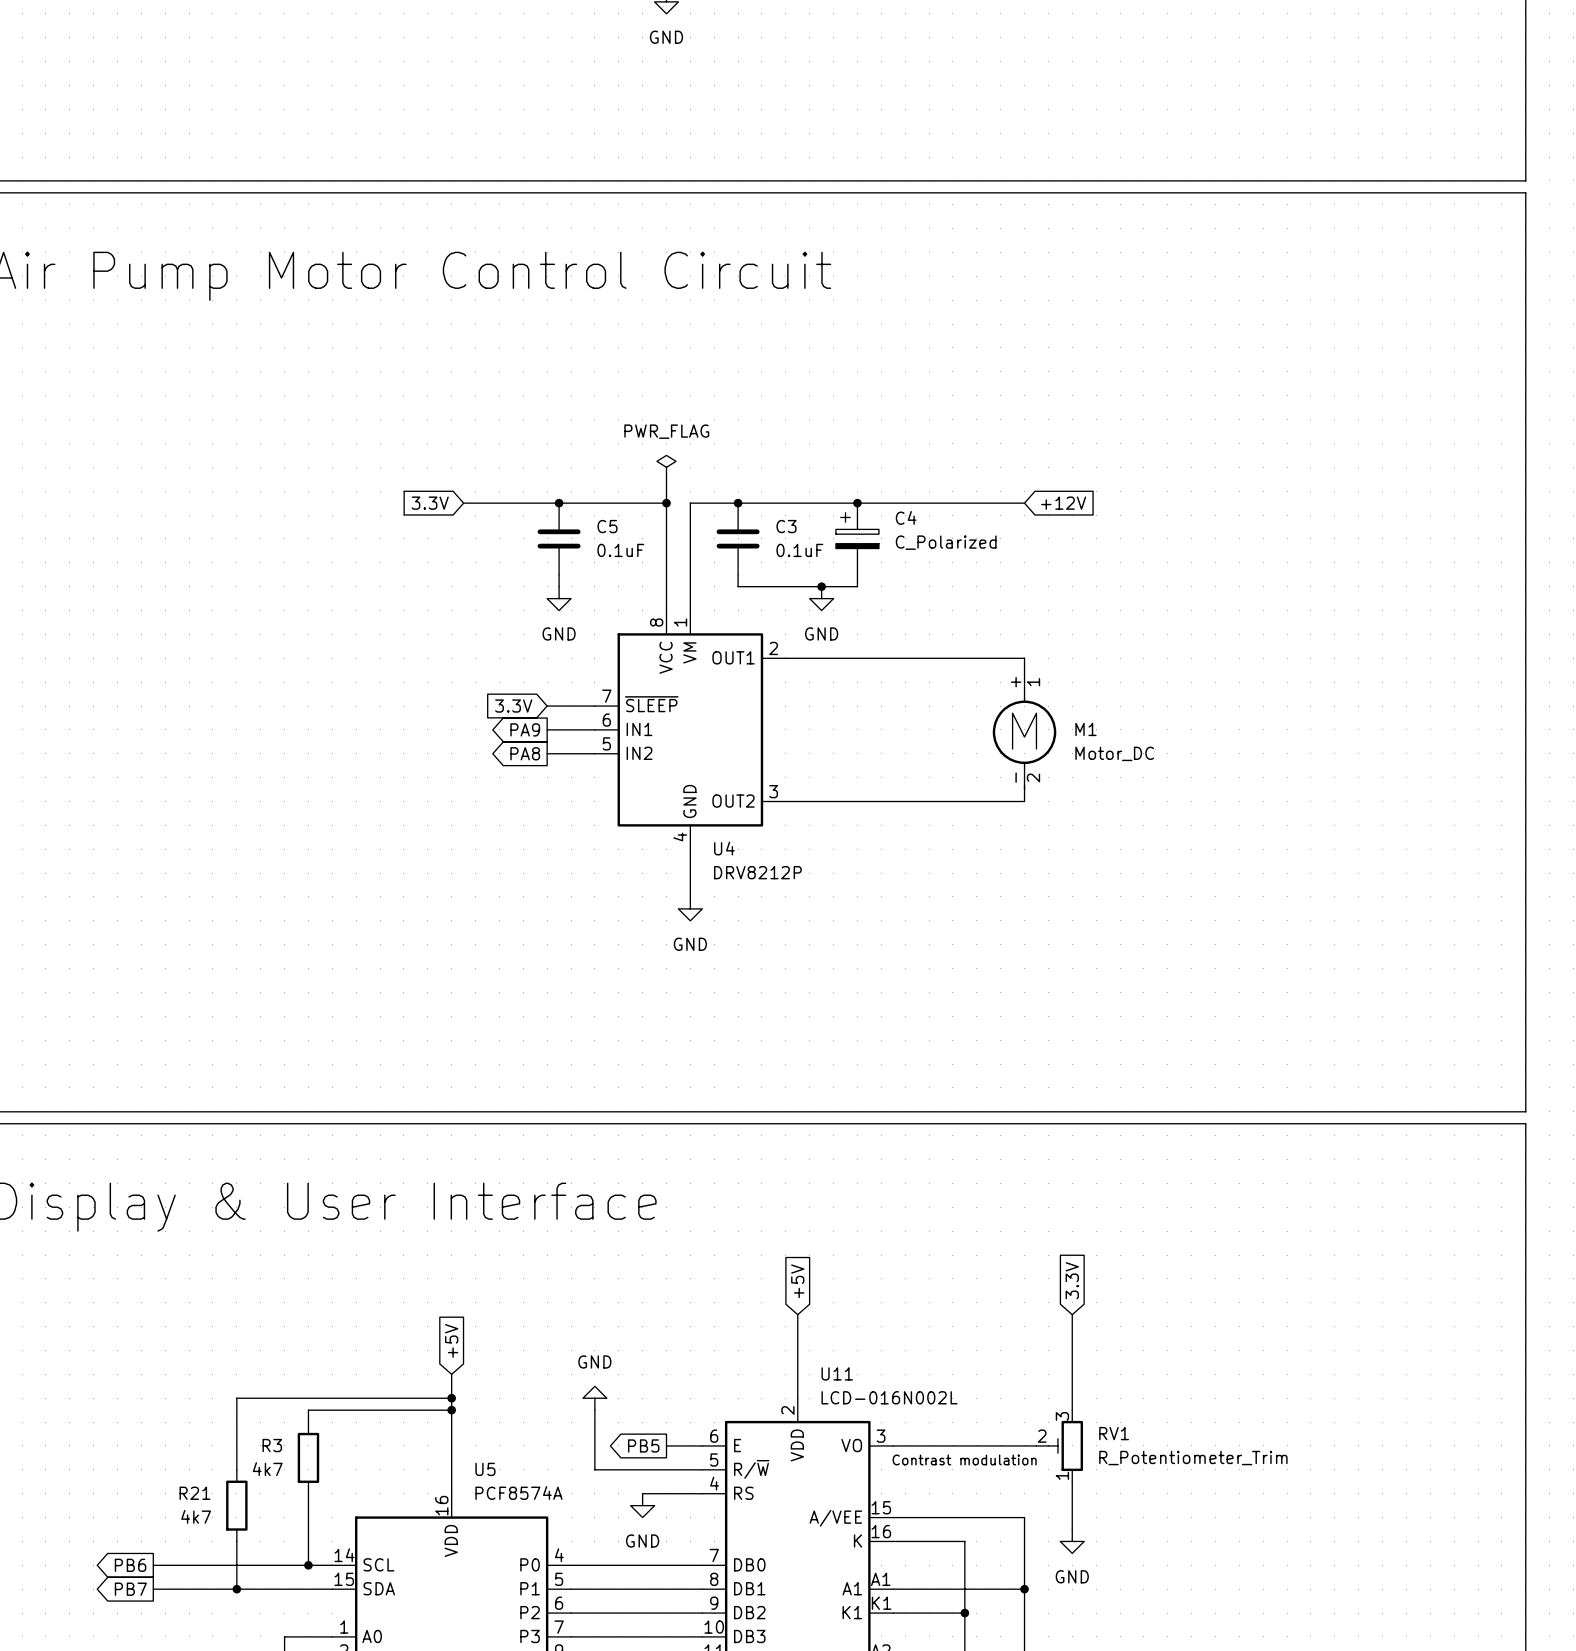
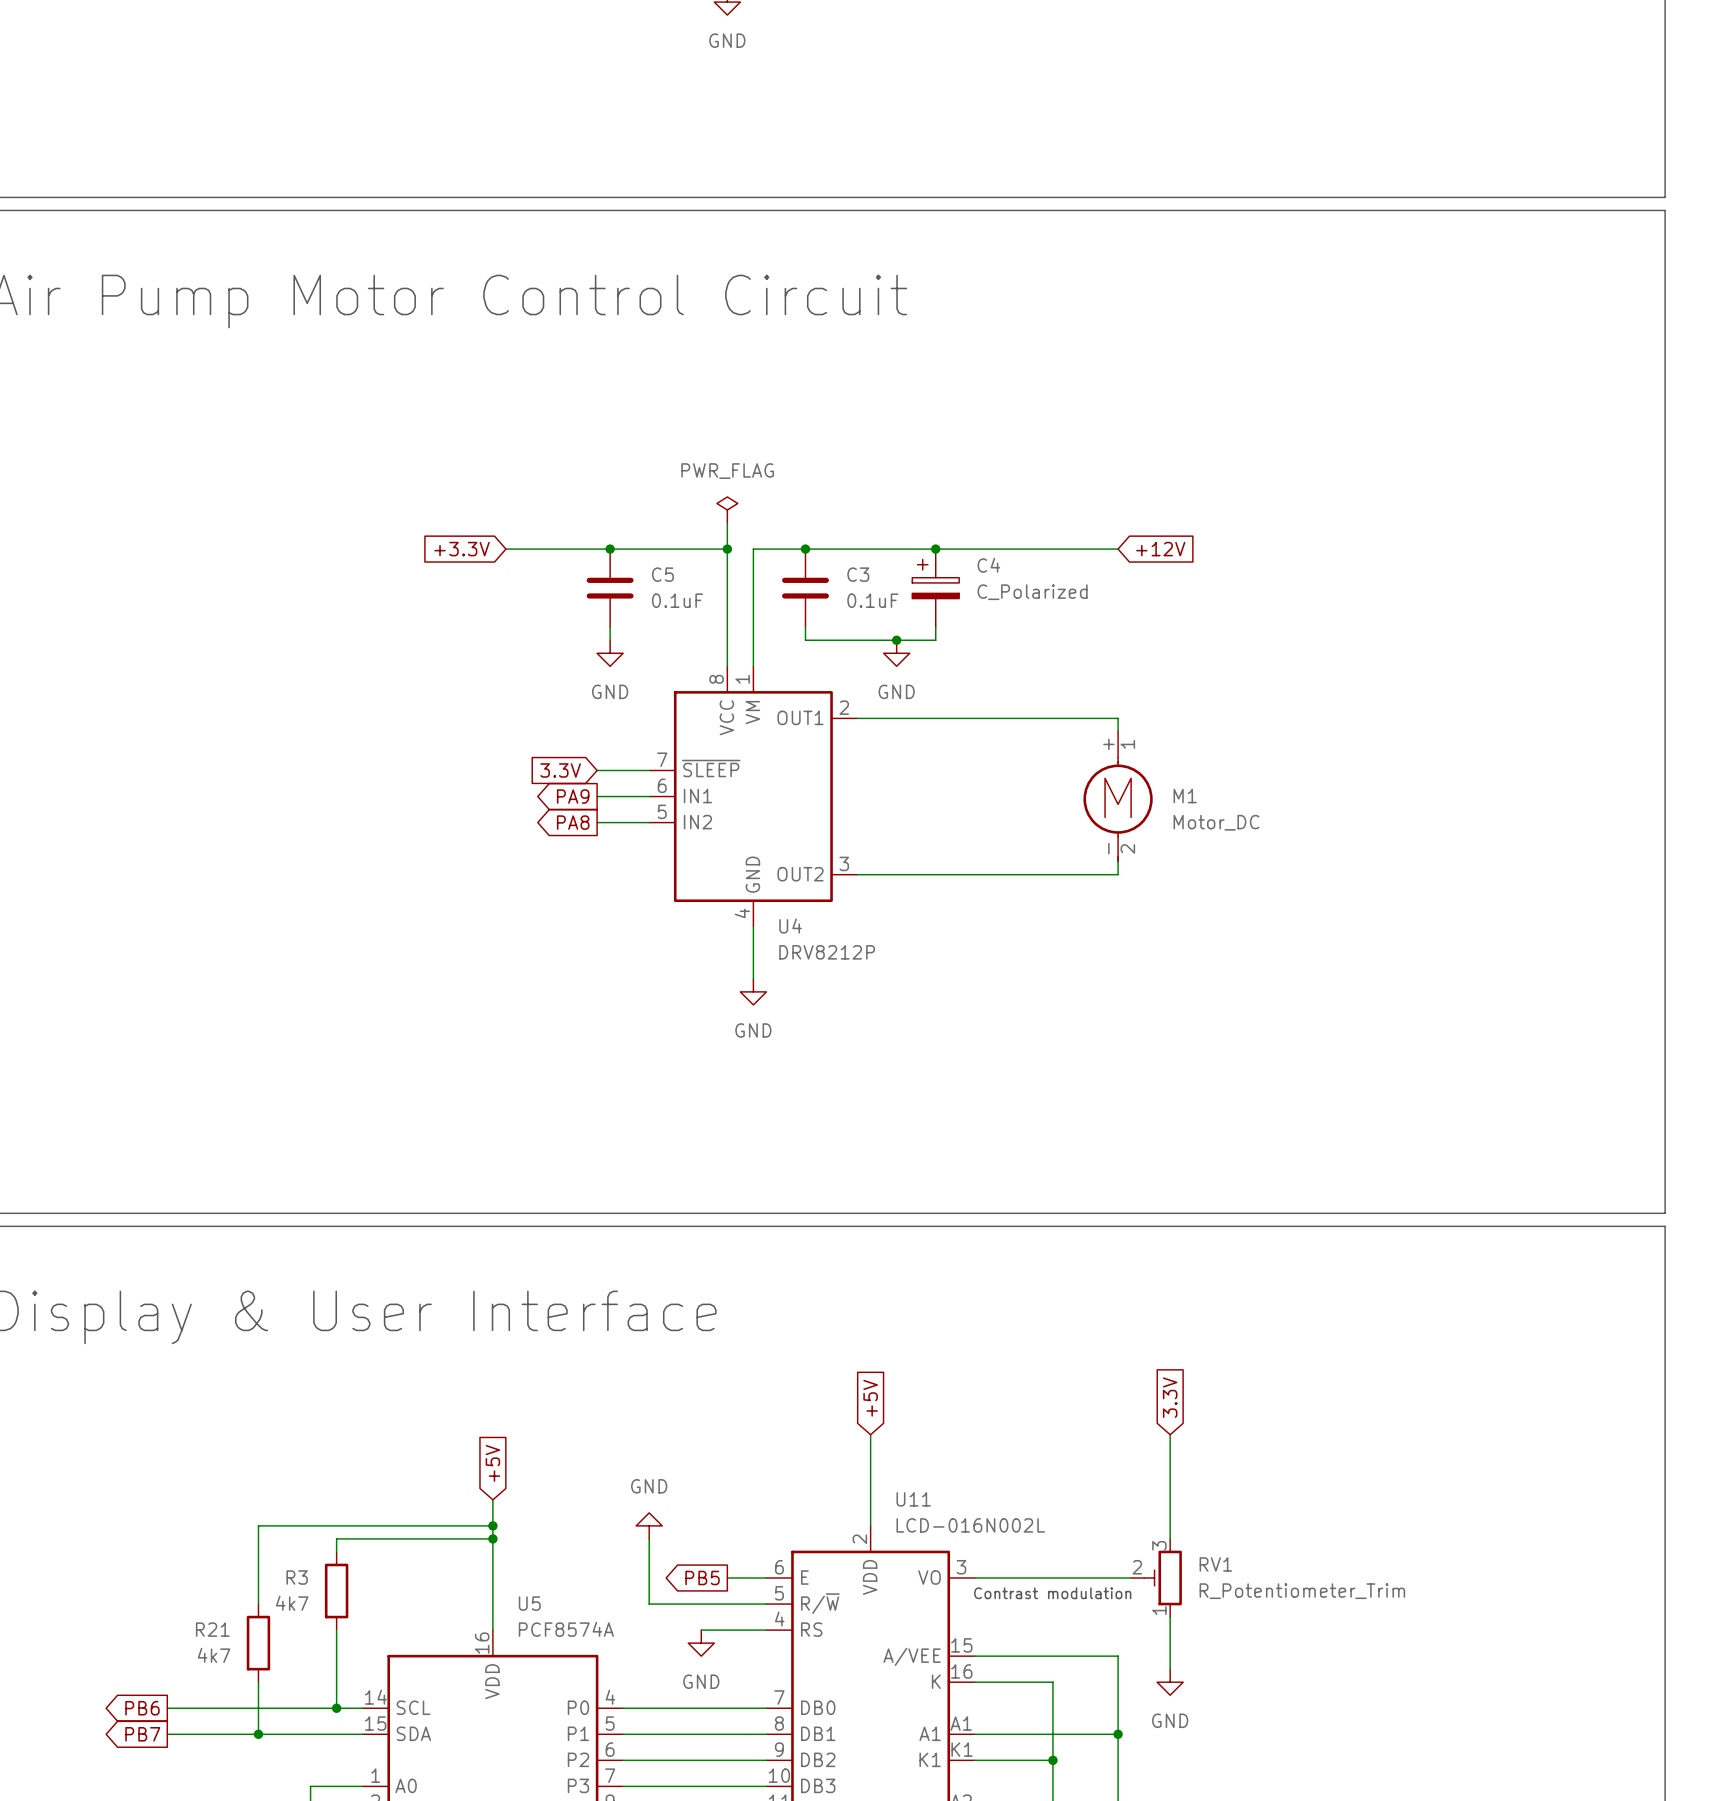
global label: 3.3V (430, 503) -> +3.3V (462, 549)

